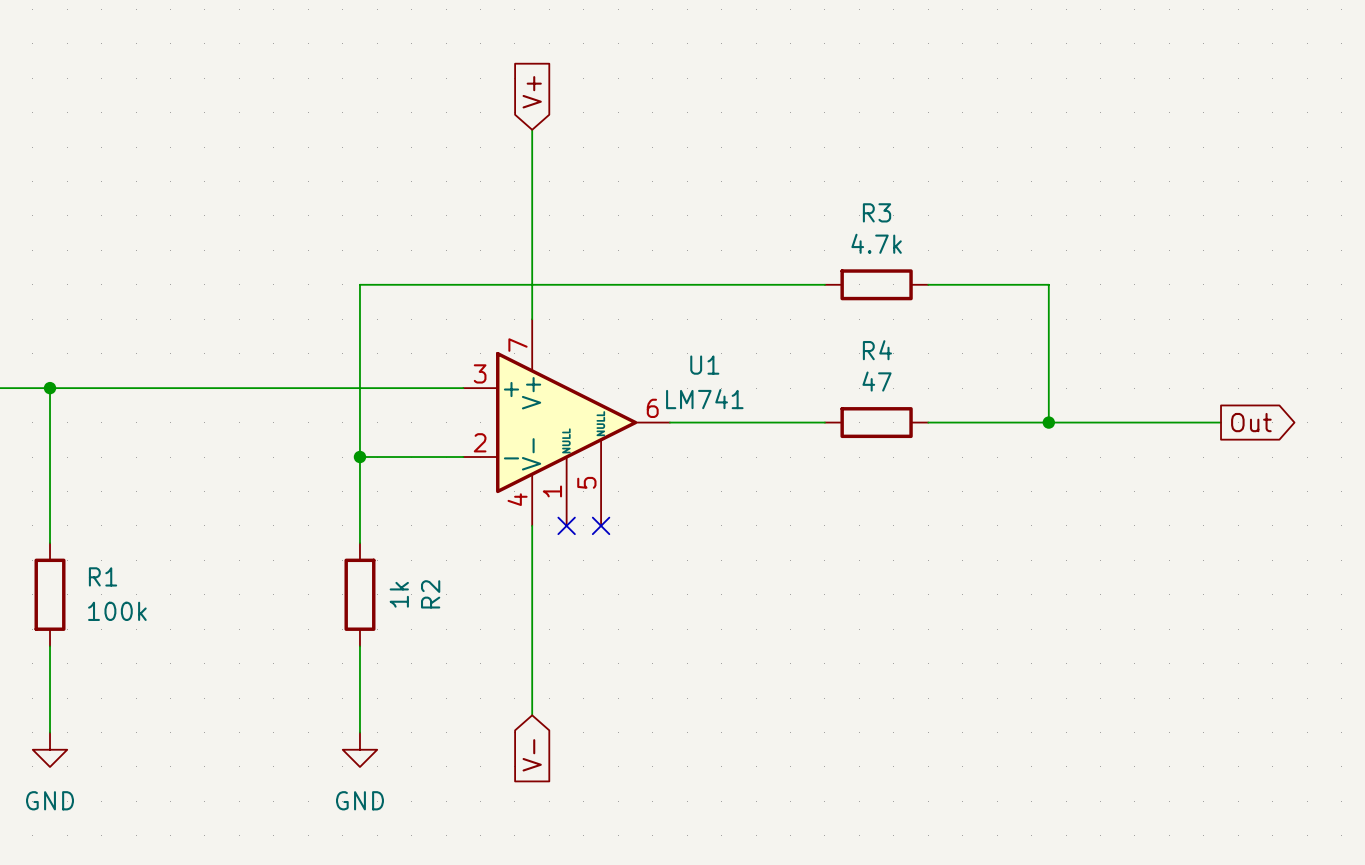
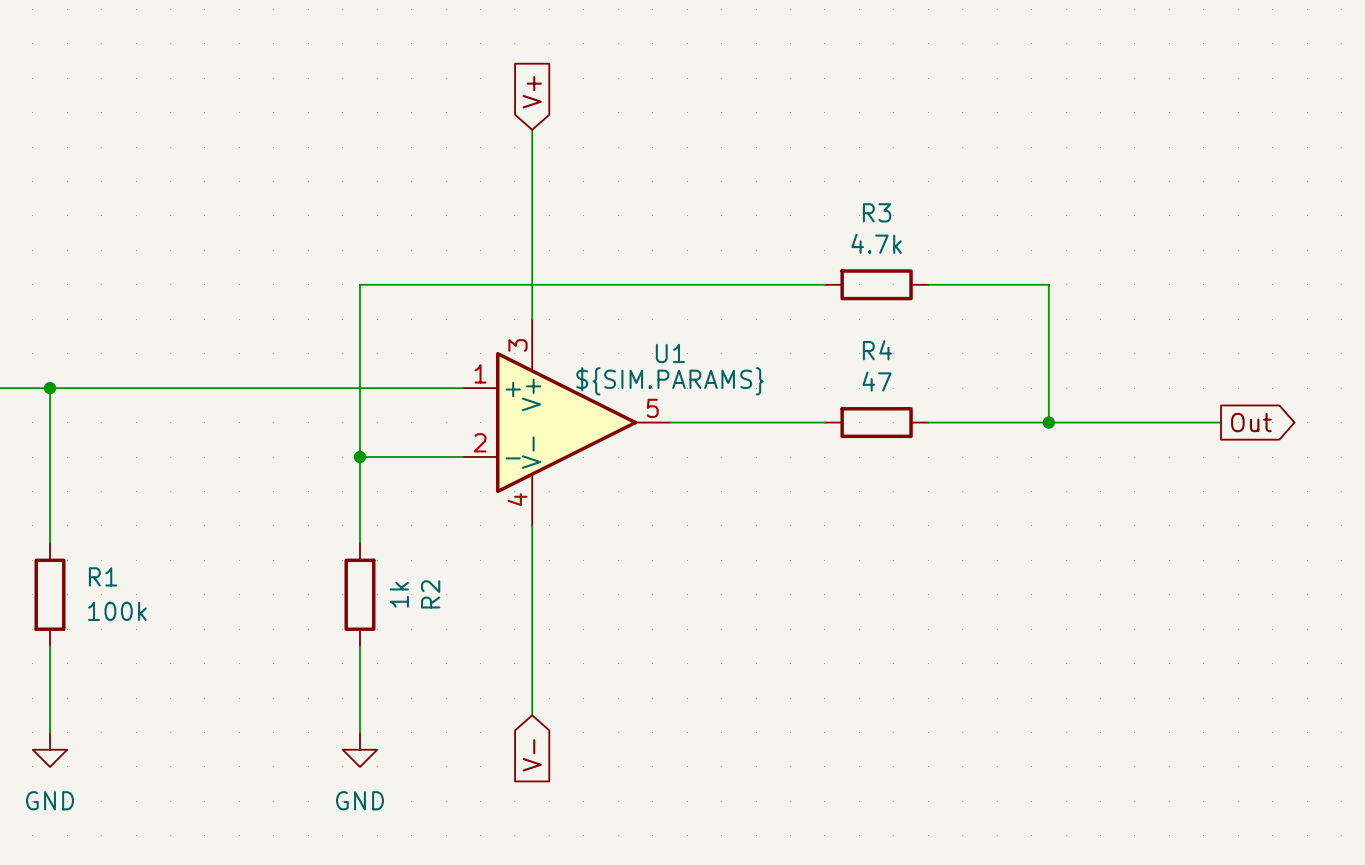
U1 symbol: [463, 319, 670, 526] -> [463, 319, 670, 526]
U1 name position: U1 (704, 365) -> U1 (670, 353)
U1 value: LM741 (704, 399) -> ${SIM.PARAMS} (669, 381)
no-connect mark: (566, 525) -> none
no-connect mark: (601, 525) -> none

